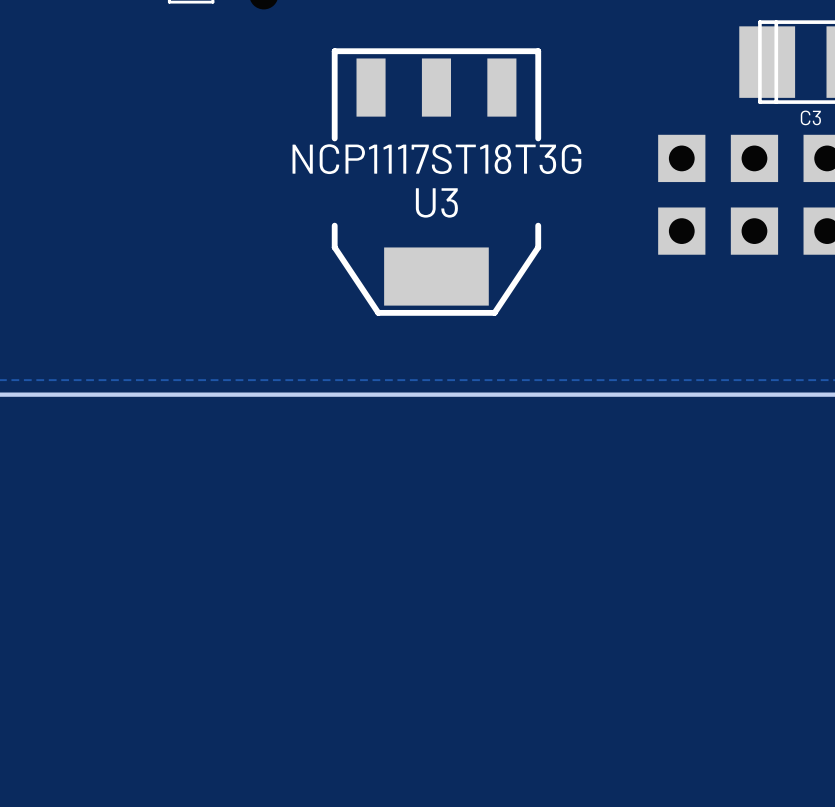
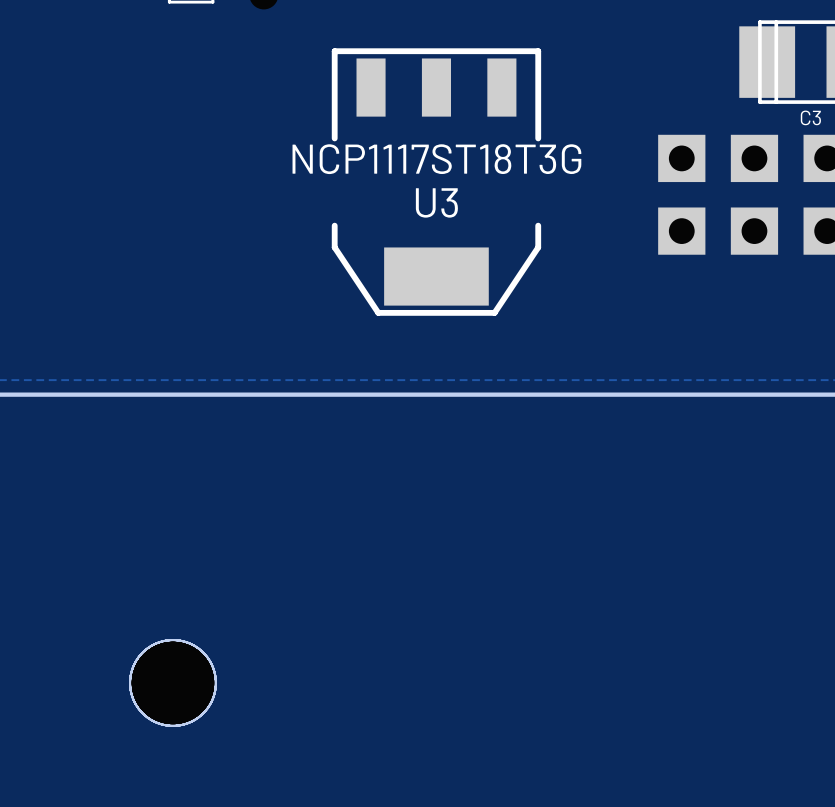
part: none -> (172, 682)

